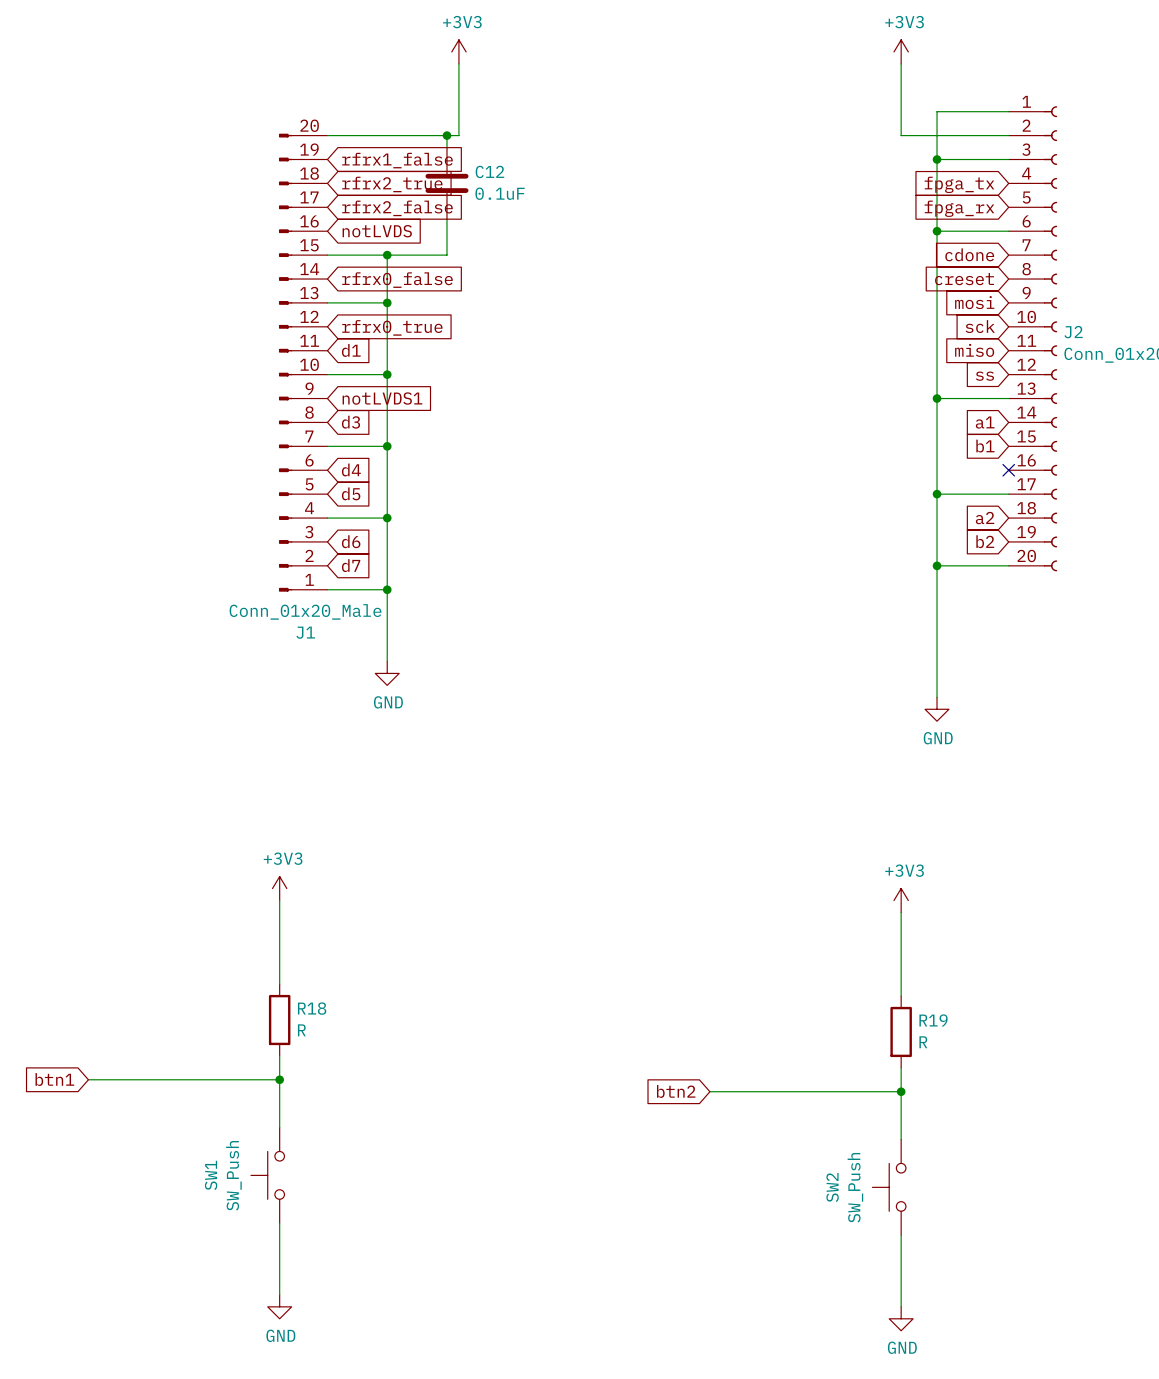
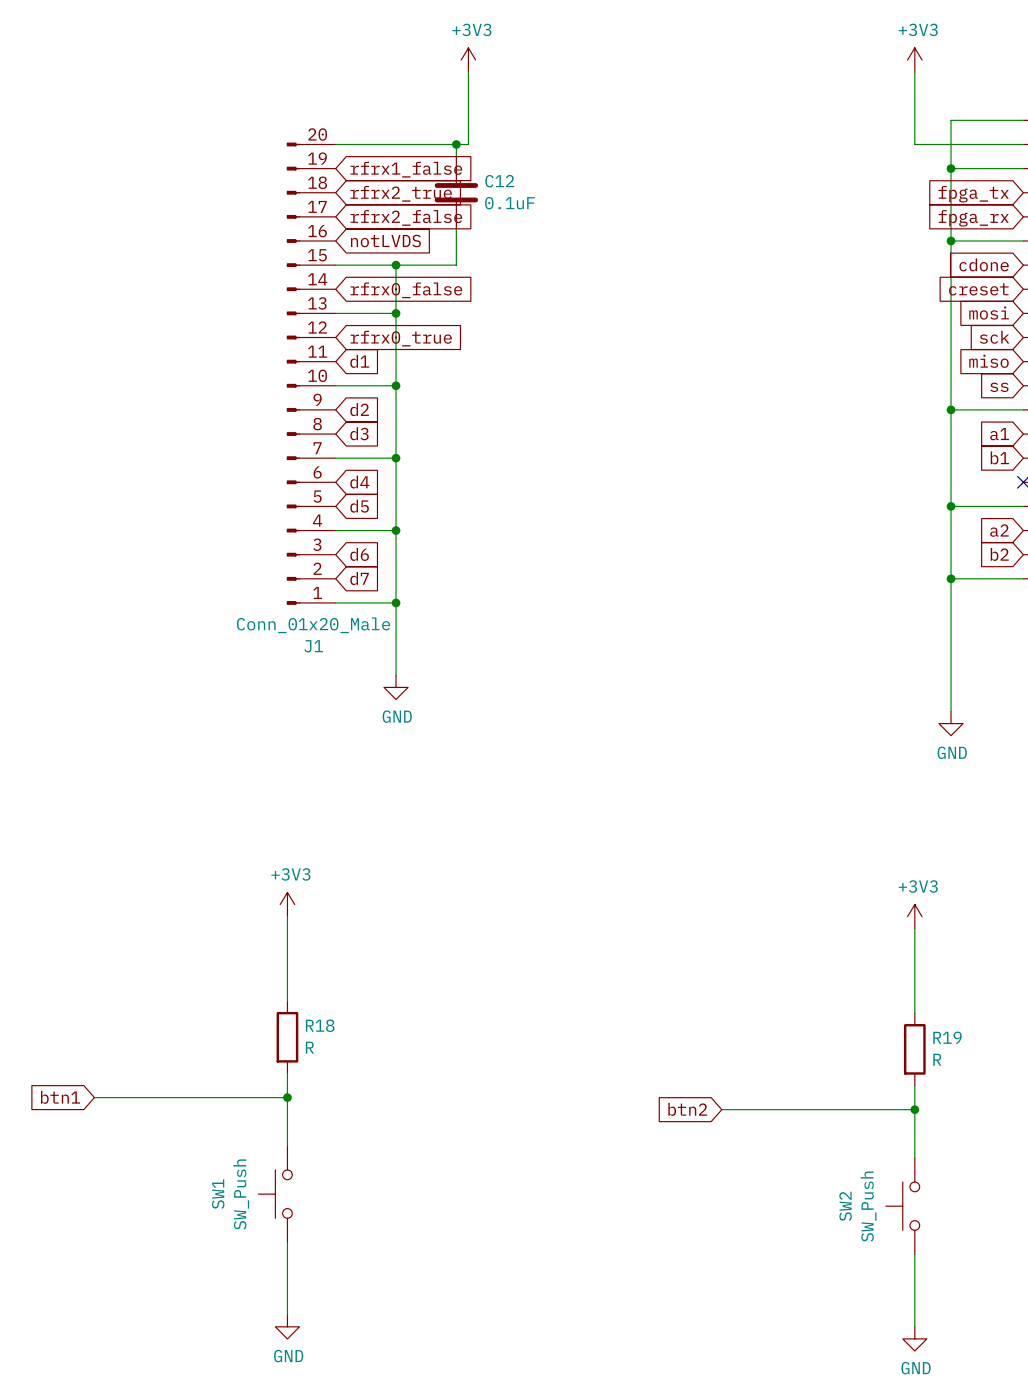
global label: notLVDS1 (382, 398) -> d2 (359, 409)

